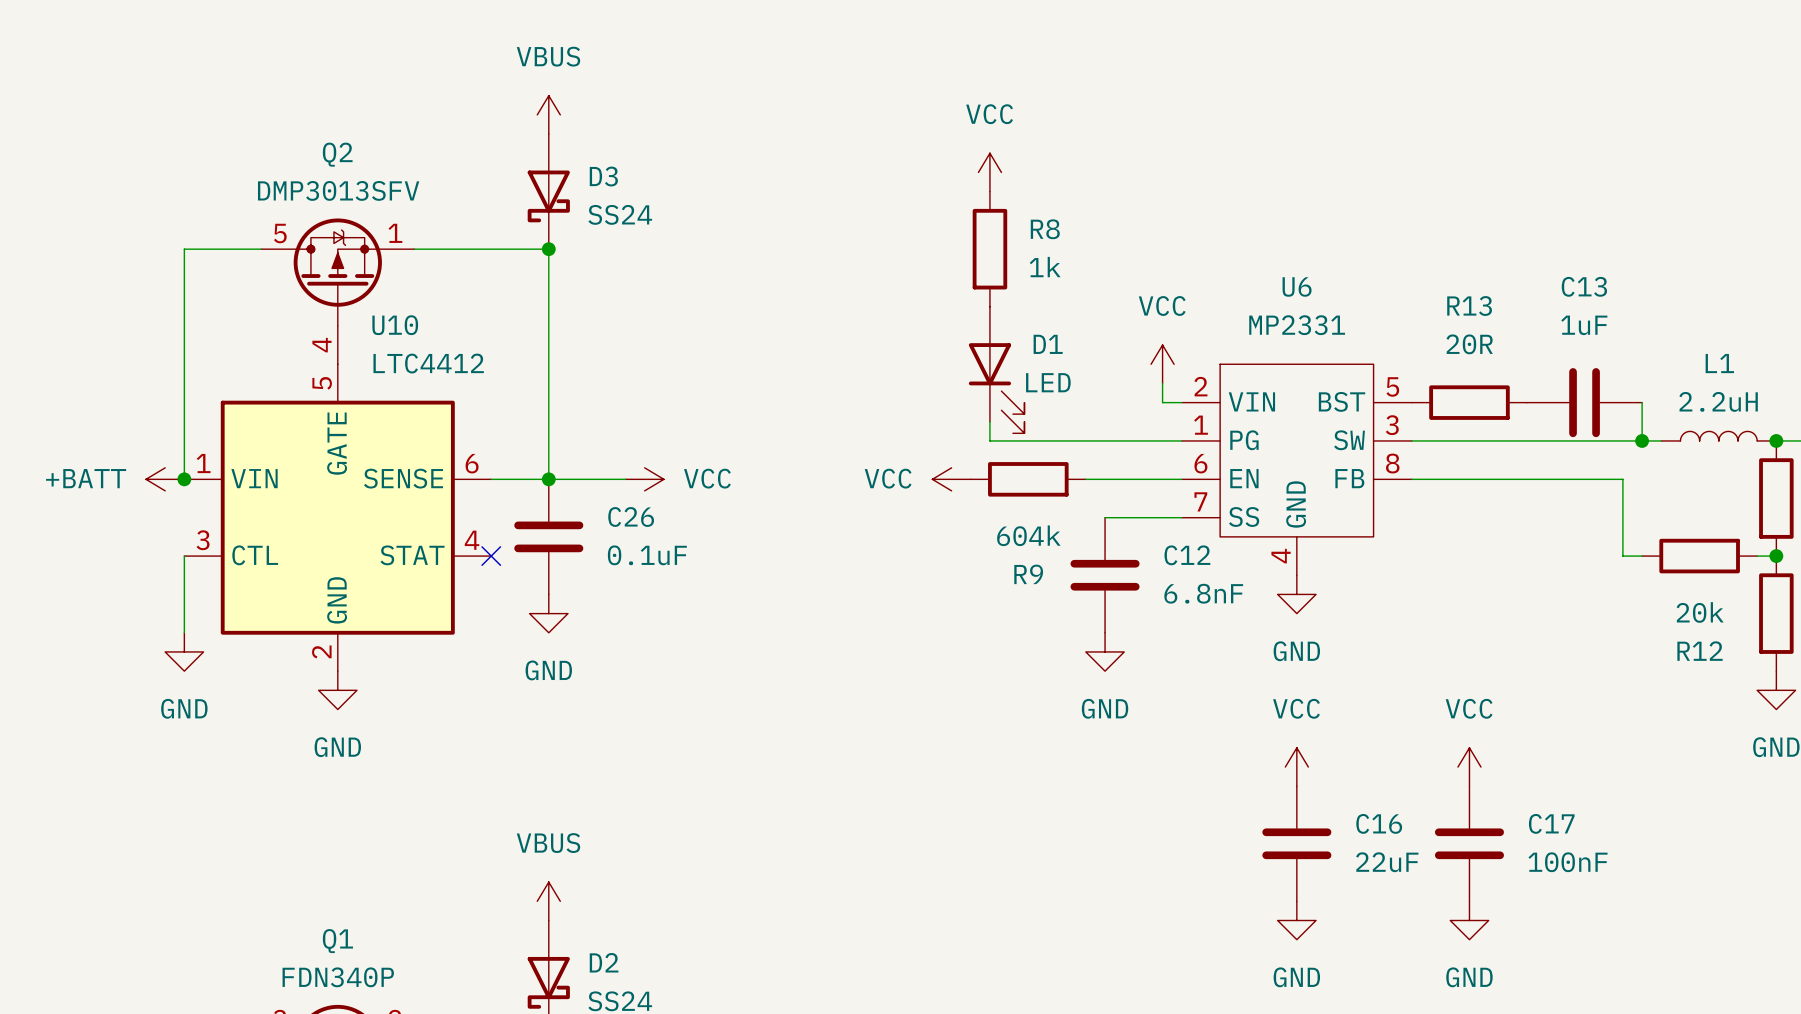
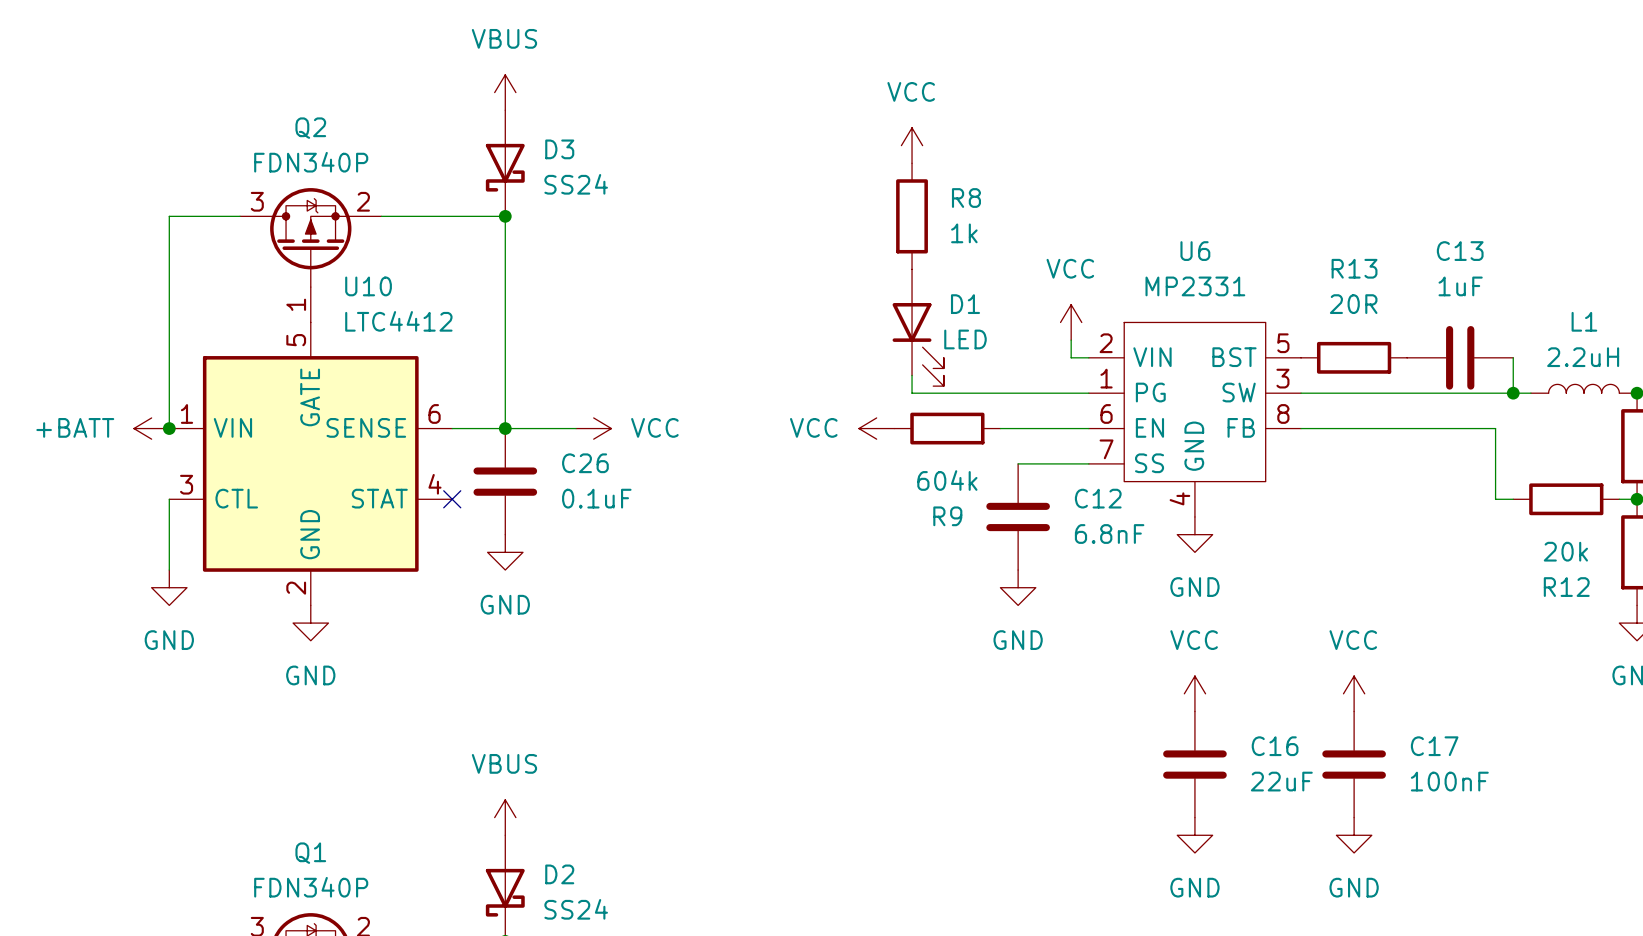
Q2 value: DMP3013SFV (338, 190) -> FDN340P (311, 162)
Q2 pin number: 5 (280, 233) -> 3 (257, 201)
Q2 pin number: 1 (395, 233) -> 2 (363, 201)
Q2 pin number: 4 (321, 345) -> 1 (296, 304)

